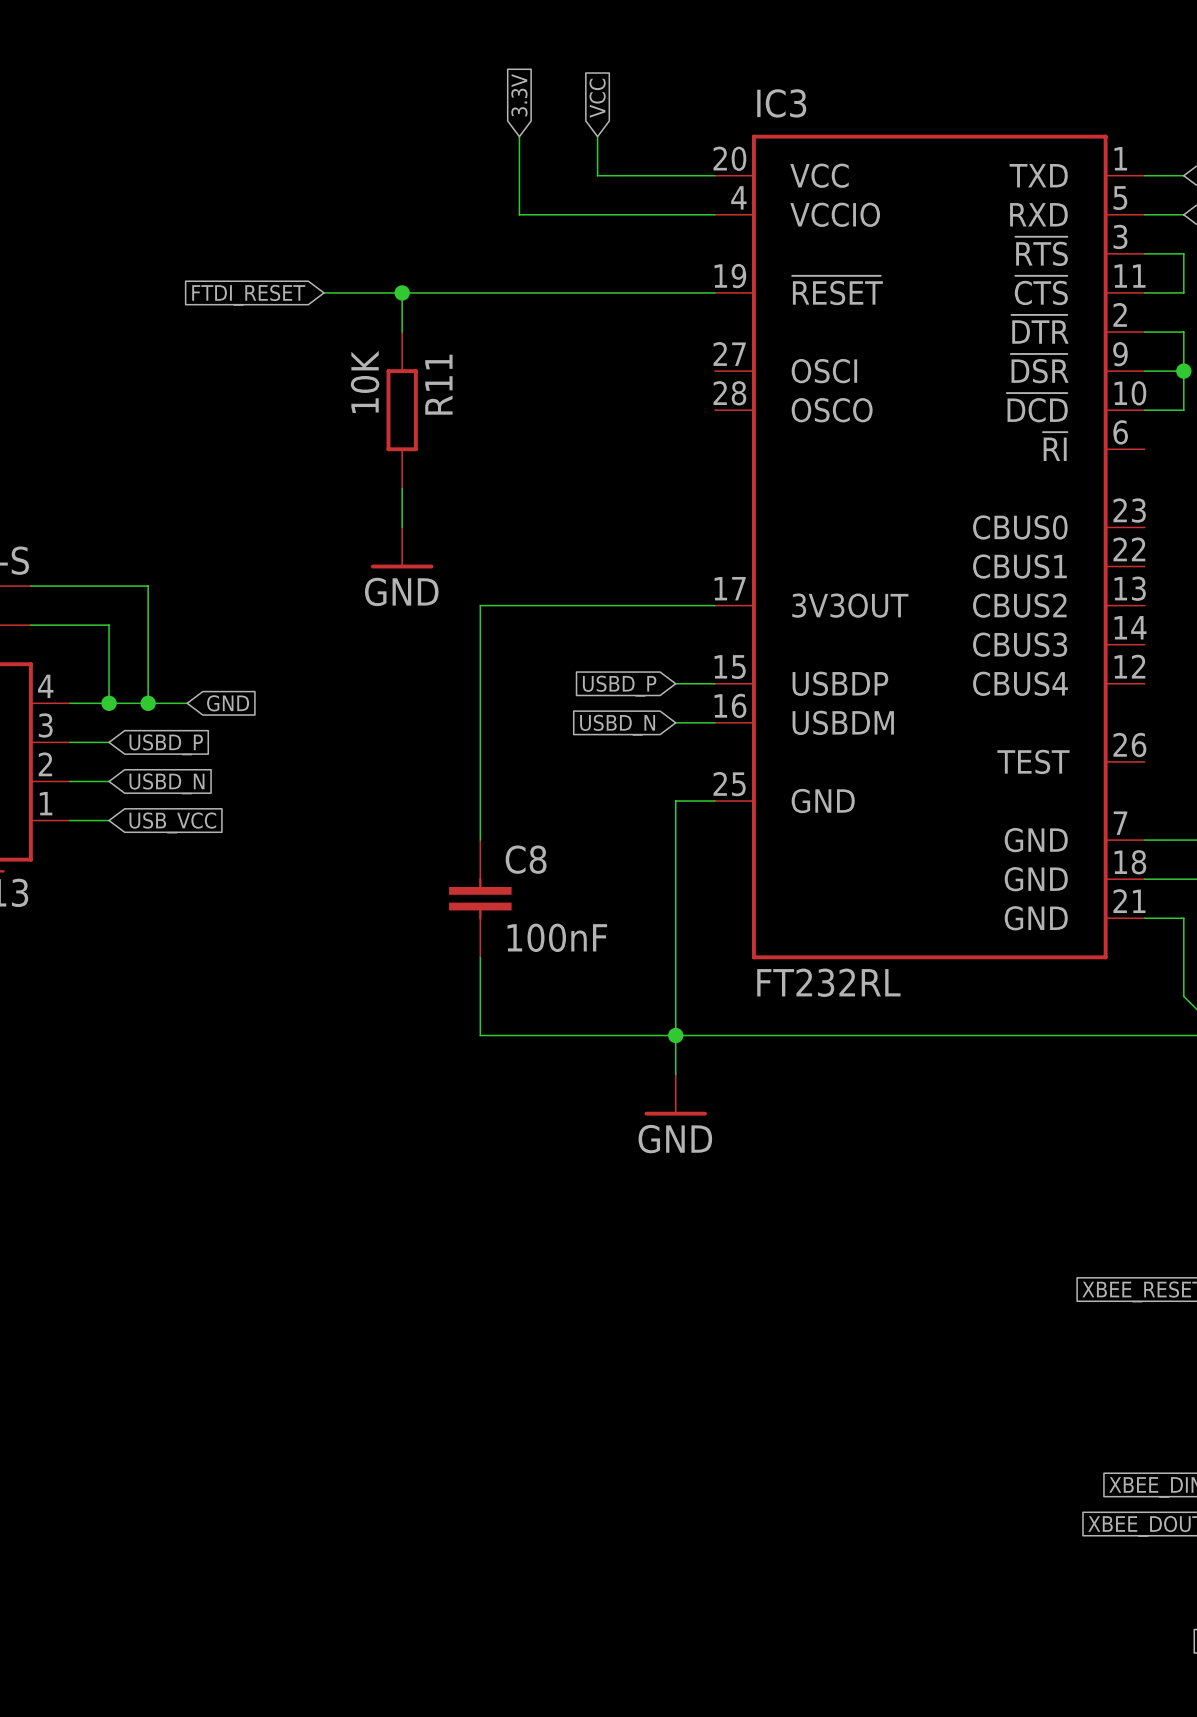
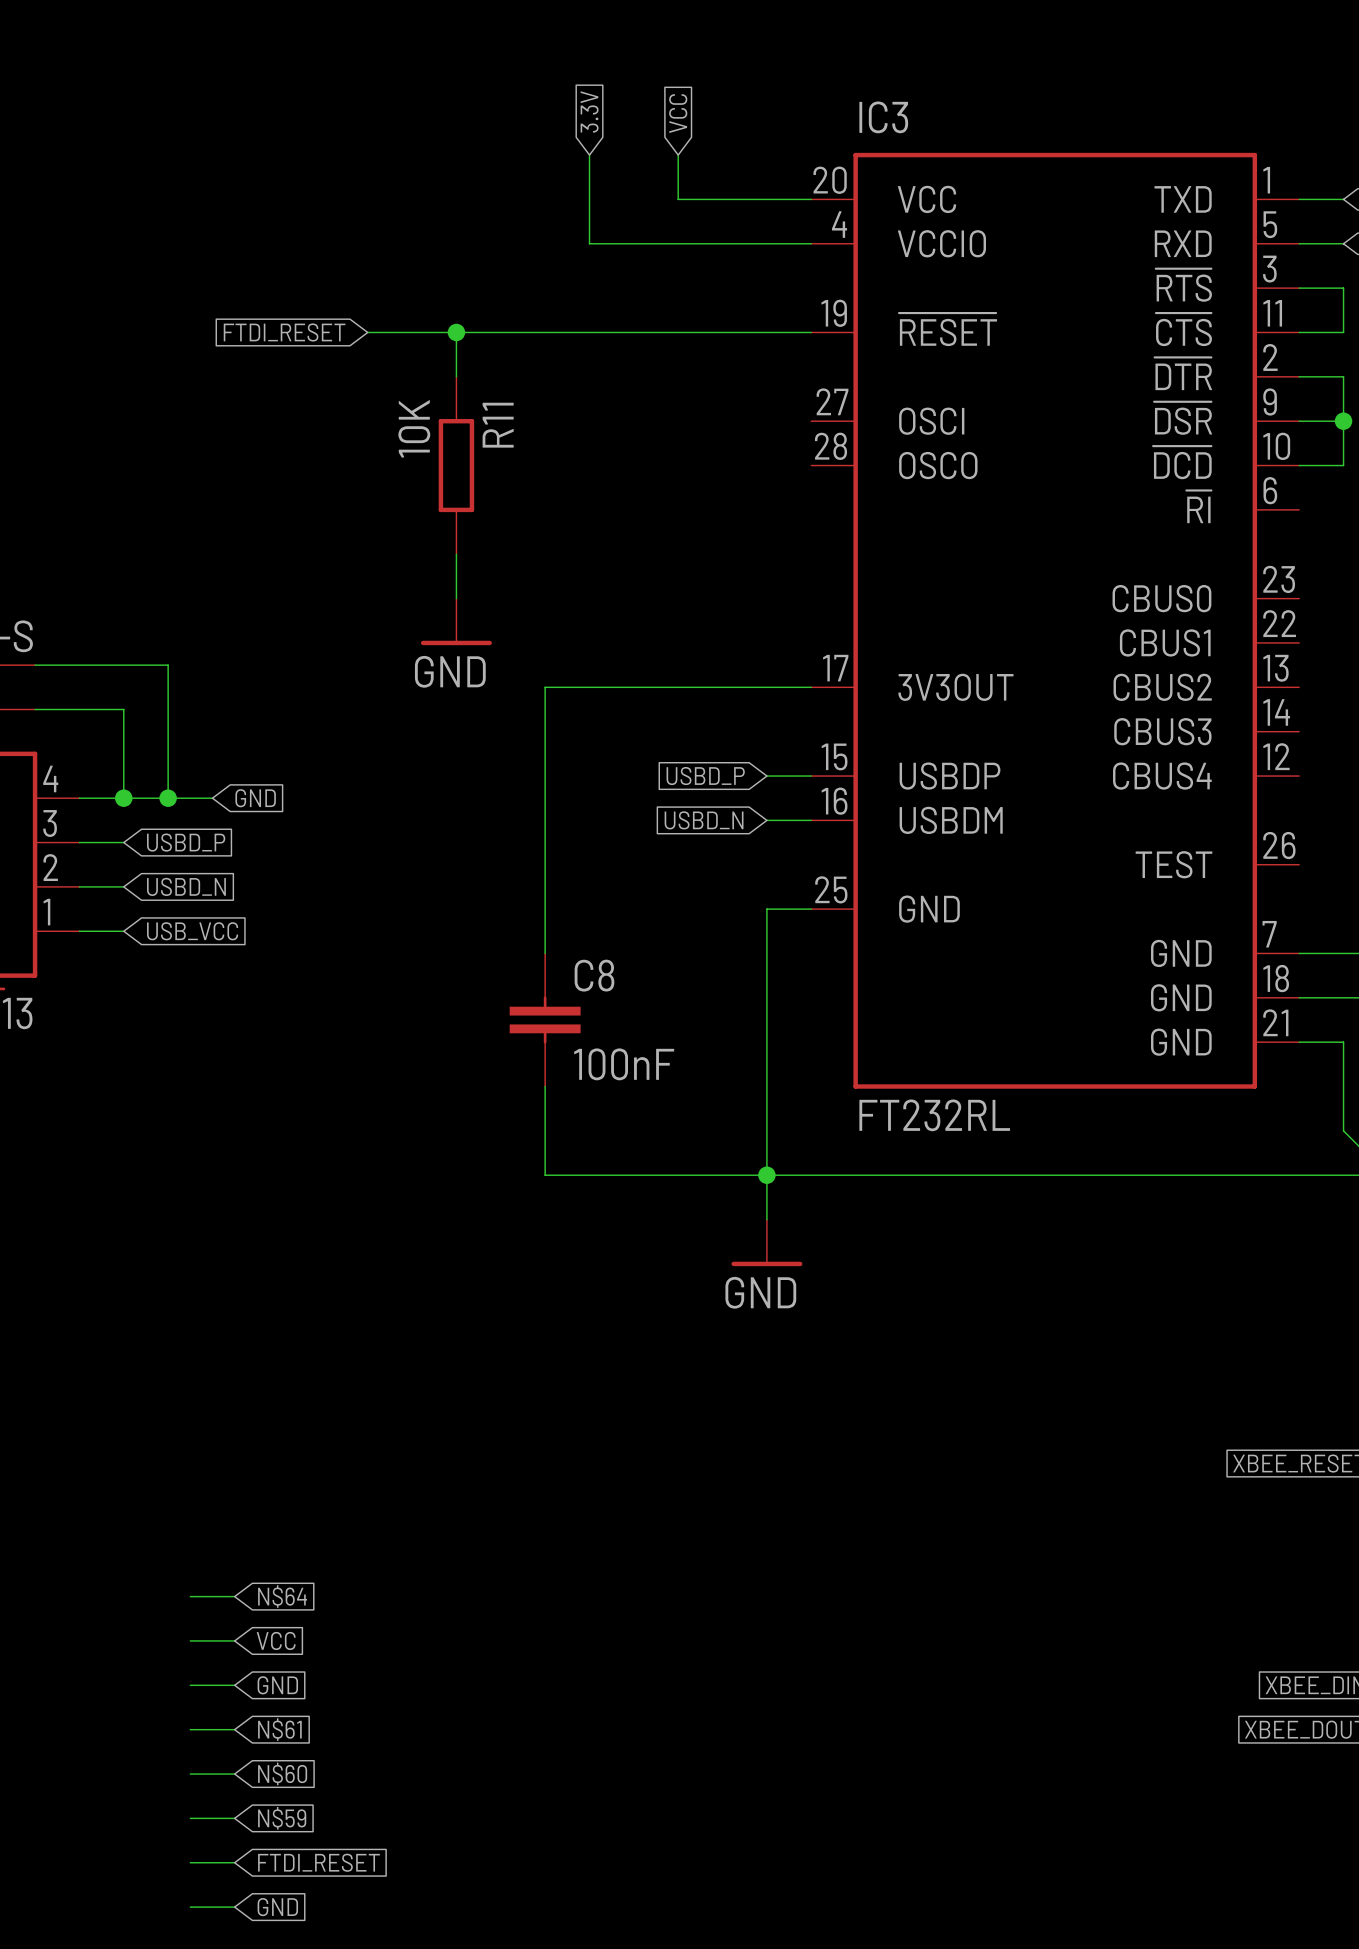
wire: none -> (190, 1596) (234, 1596)
global label: none -> N$64 (282, 1596)
wire: none -> (190, 1640) (234, 1640)
global label: none -> VCC (276, 1640)
wire: none -> (190, 1685) (234, 1685)
global label: none -> GND (277, 1685)
wire: none -> (190, 1729) (234, 1729)
global label: none -> N$61 (279, 1729)
wire: none -> (190, 1774) (234, 1774)
global label: none -> N$60 (282, 1773)
wire: none -> (190, 1818) (234, 1818)
global label: none -> N$59 (282, 1818)
wire: none -> (190, 1862) (234, 1862)
global label: none -> FTDI_RESET (318, 1862)
wire: none -> (190, 1907) (234, 1907)
global label: none -> GND (277, 1907)

